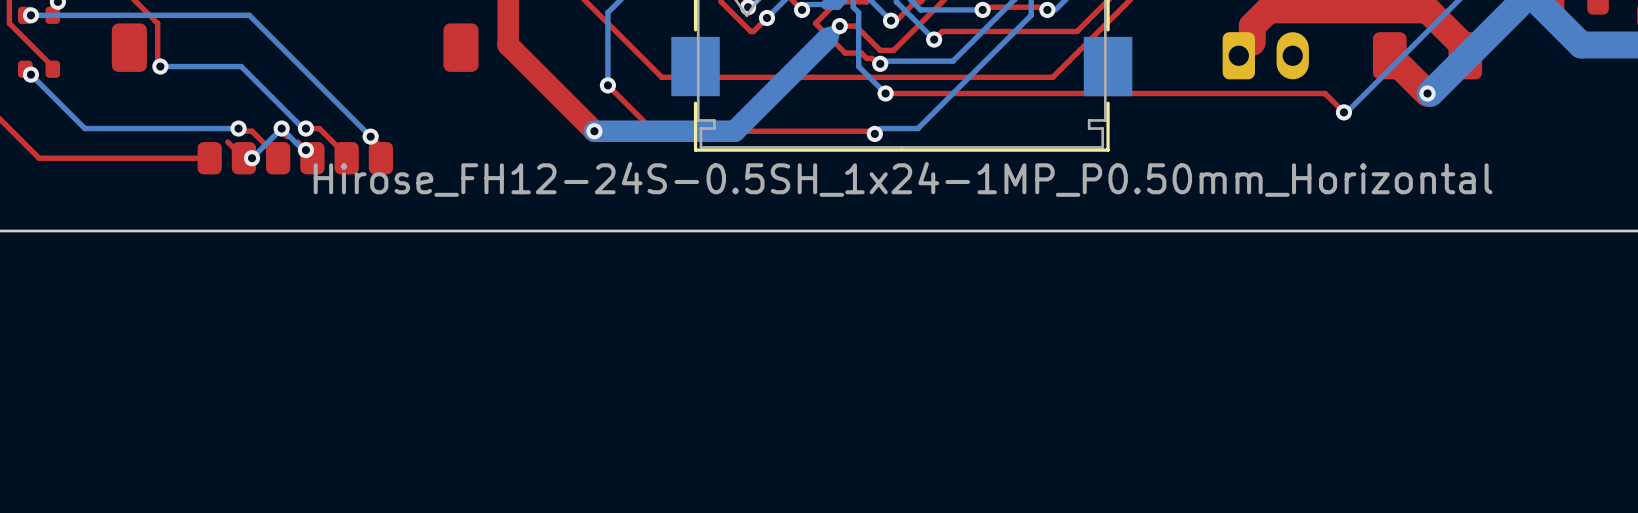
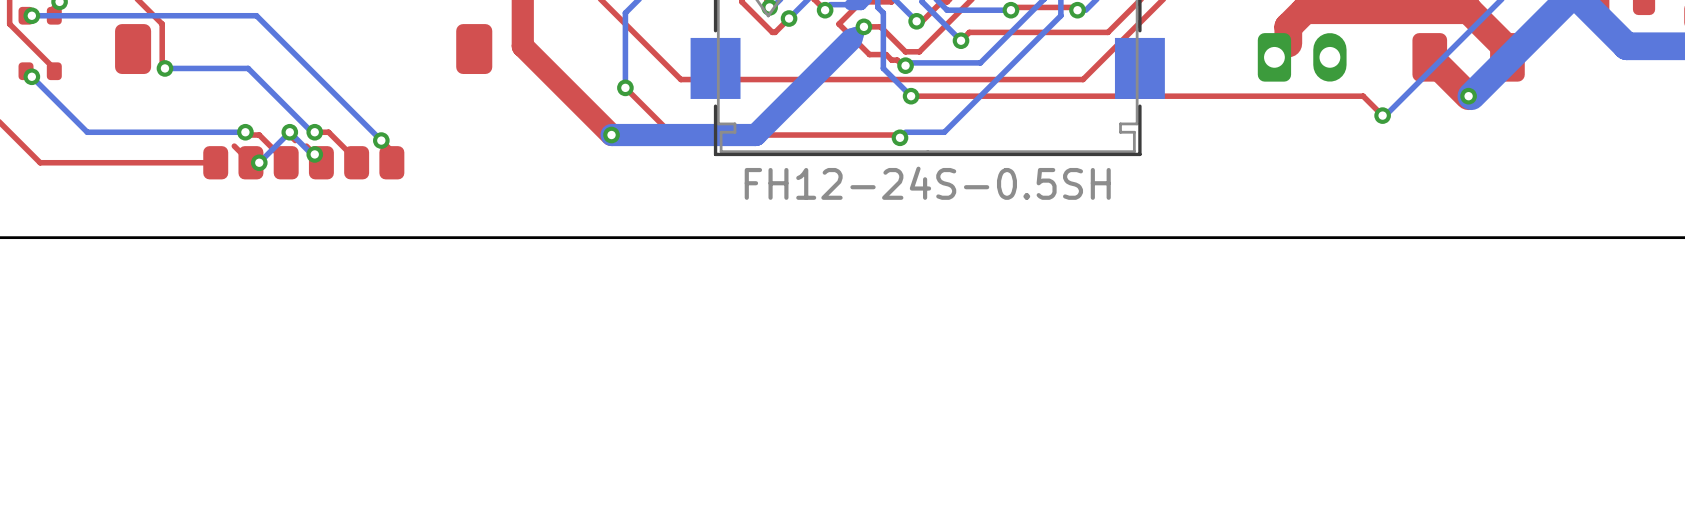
part value: Hirose_FH12-24S-0.5SH_1x24-1MP_P0.50mm_Horizontal (903, 179) -> FH12-24S-0.5SH (927, 183)

